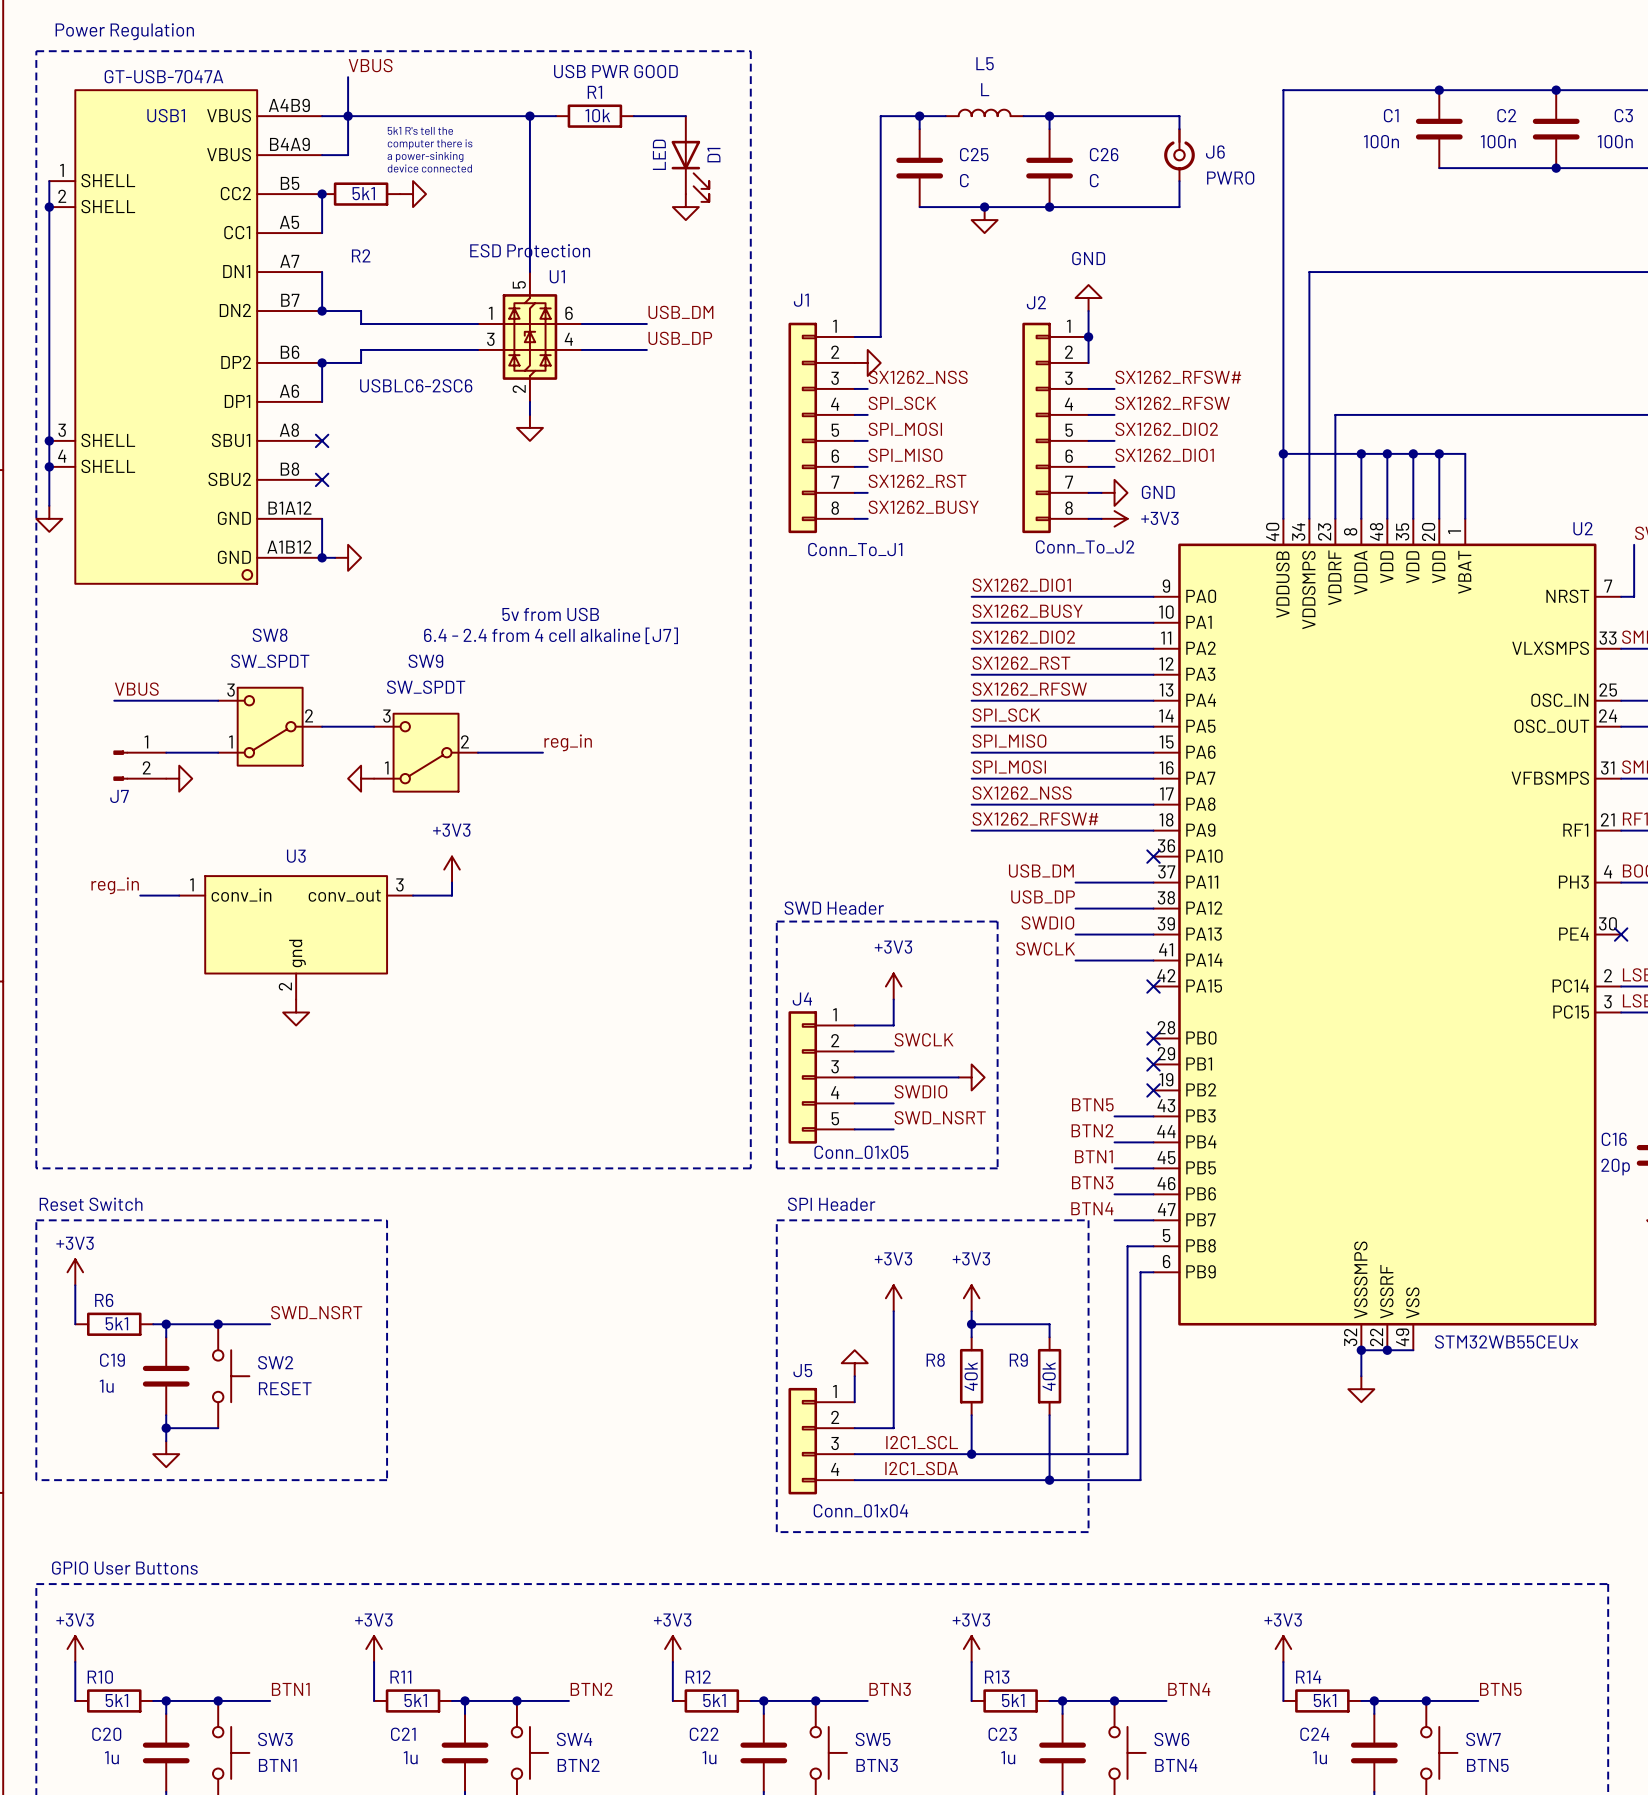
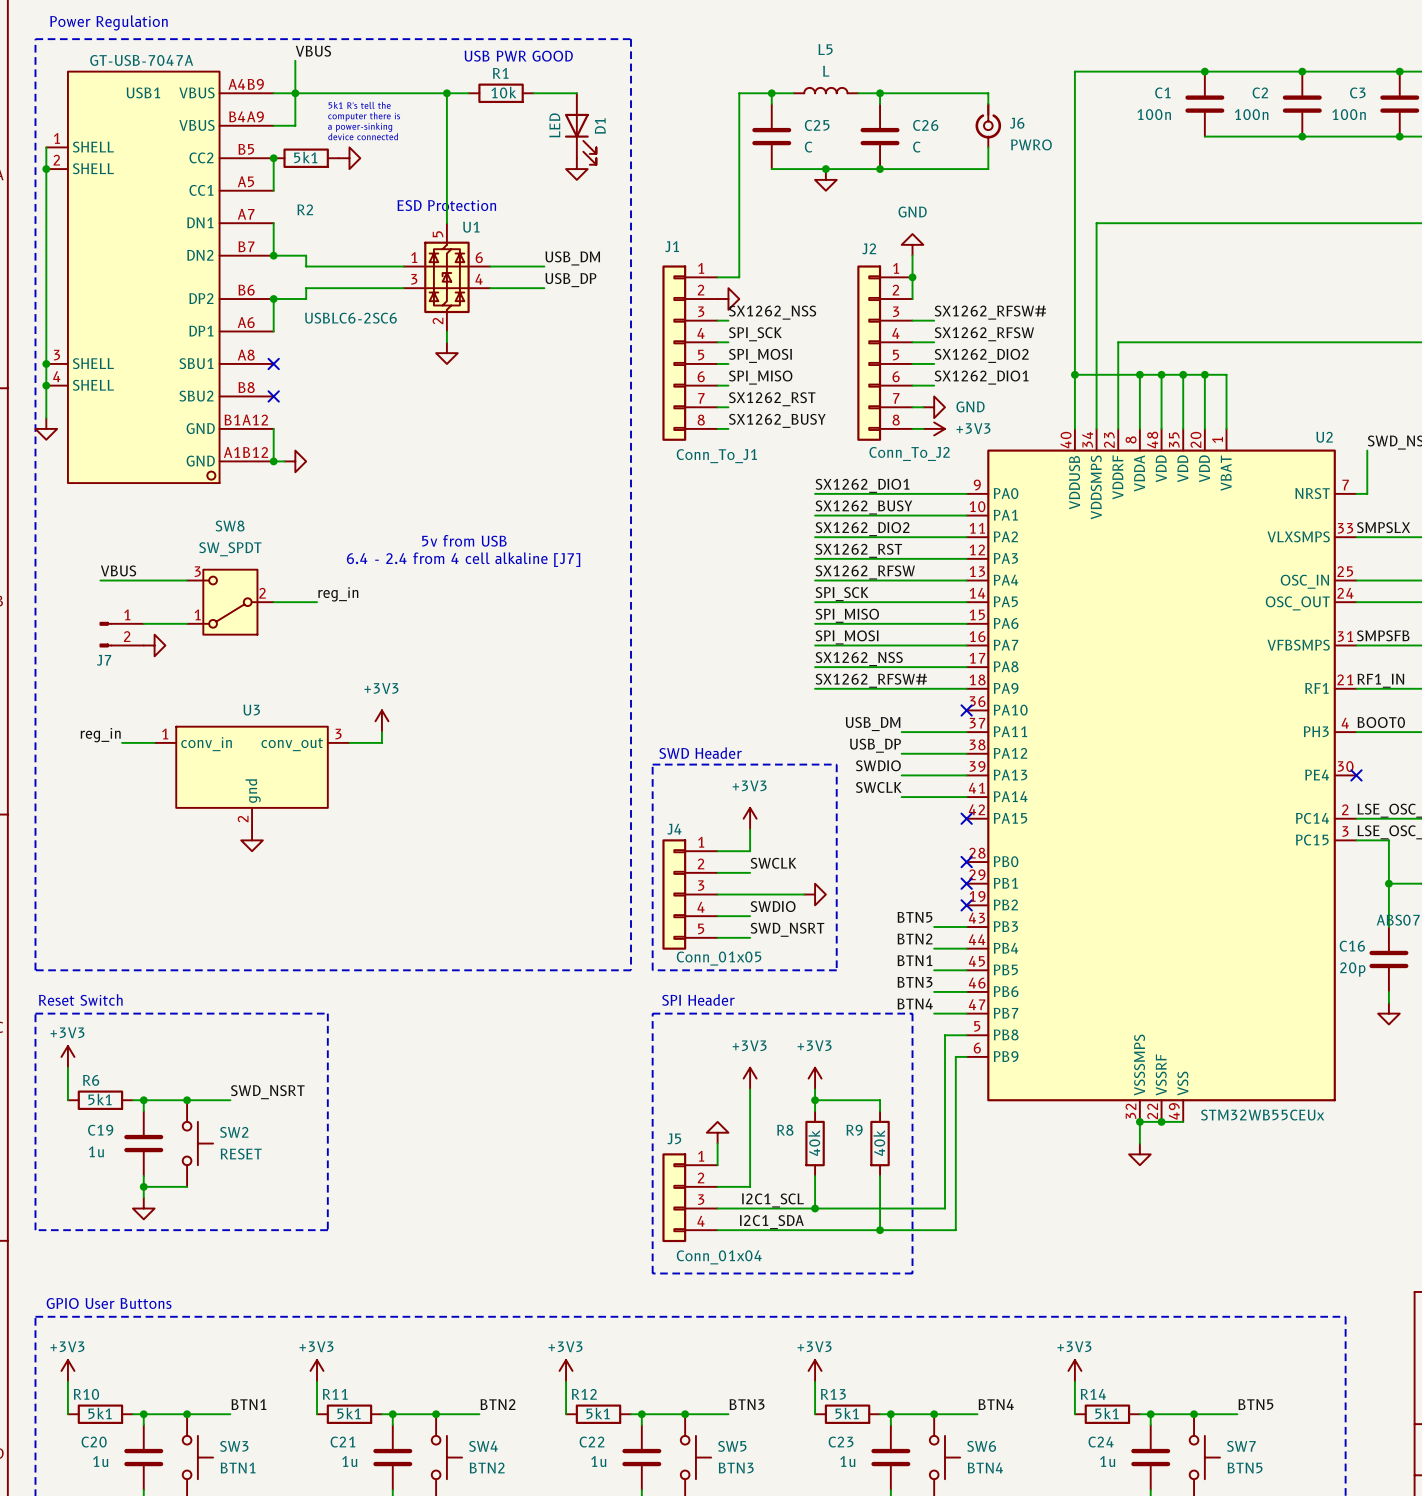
text position: 5v from USB (550, 614) -> 5v from USB (464, 540)
text position: 6.4 - 2.4 from 4 cell alkaline [J7] (551, 635) -> 6.4 - 2.4 from 4 cell alkaline [J7] (463, 559)
label position: reg_in (568, 742) -> reg_in (338, 594)
SW9: SW_SPDT (426, 752) -> none
wire: (478, 752) (542, 752) -> none
power symbol: (361, 778) -> none

